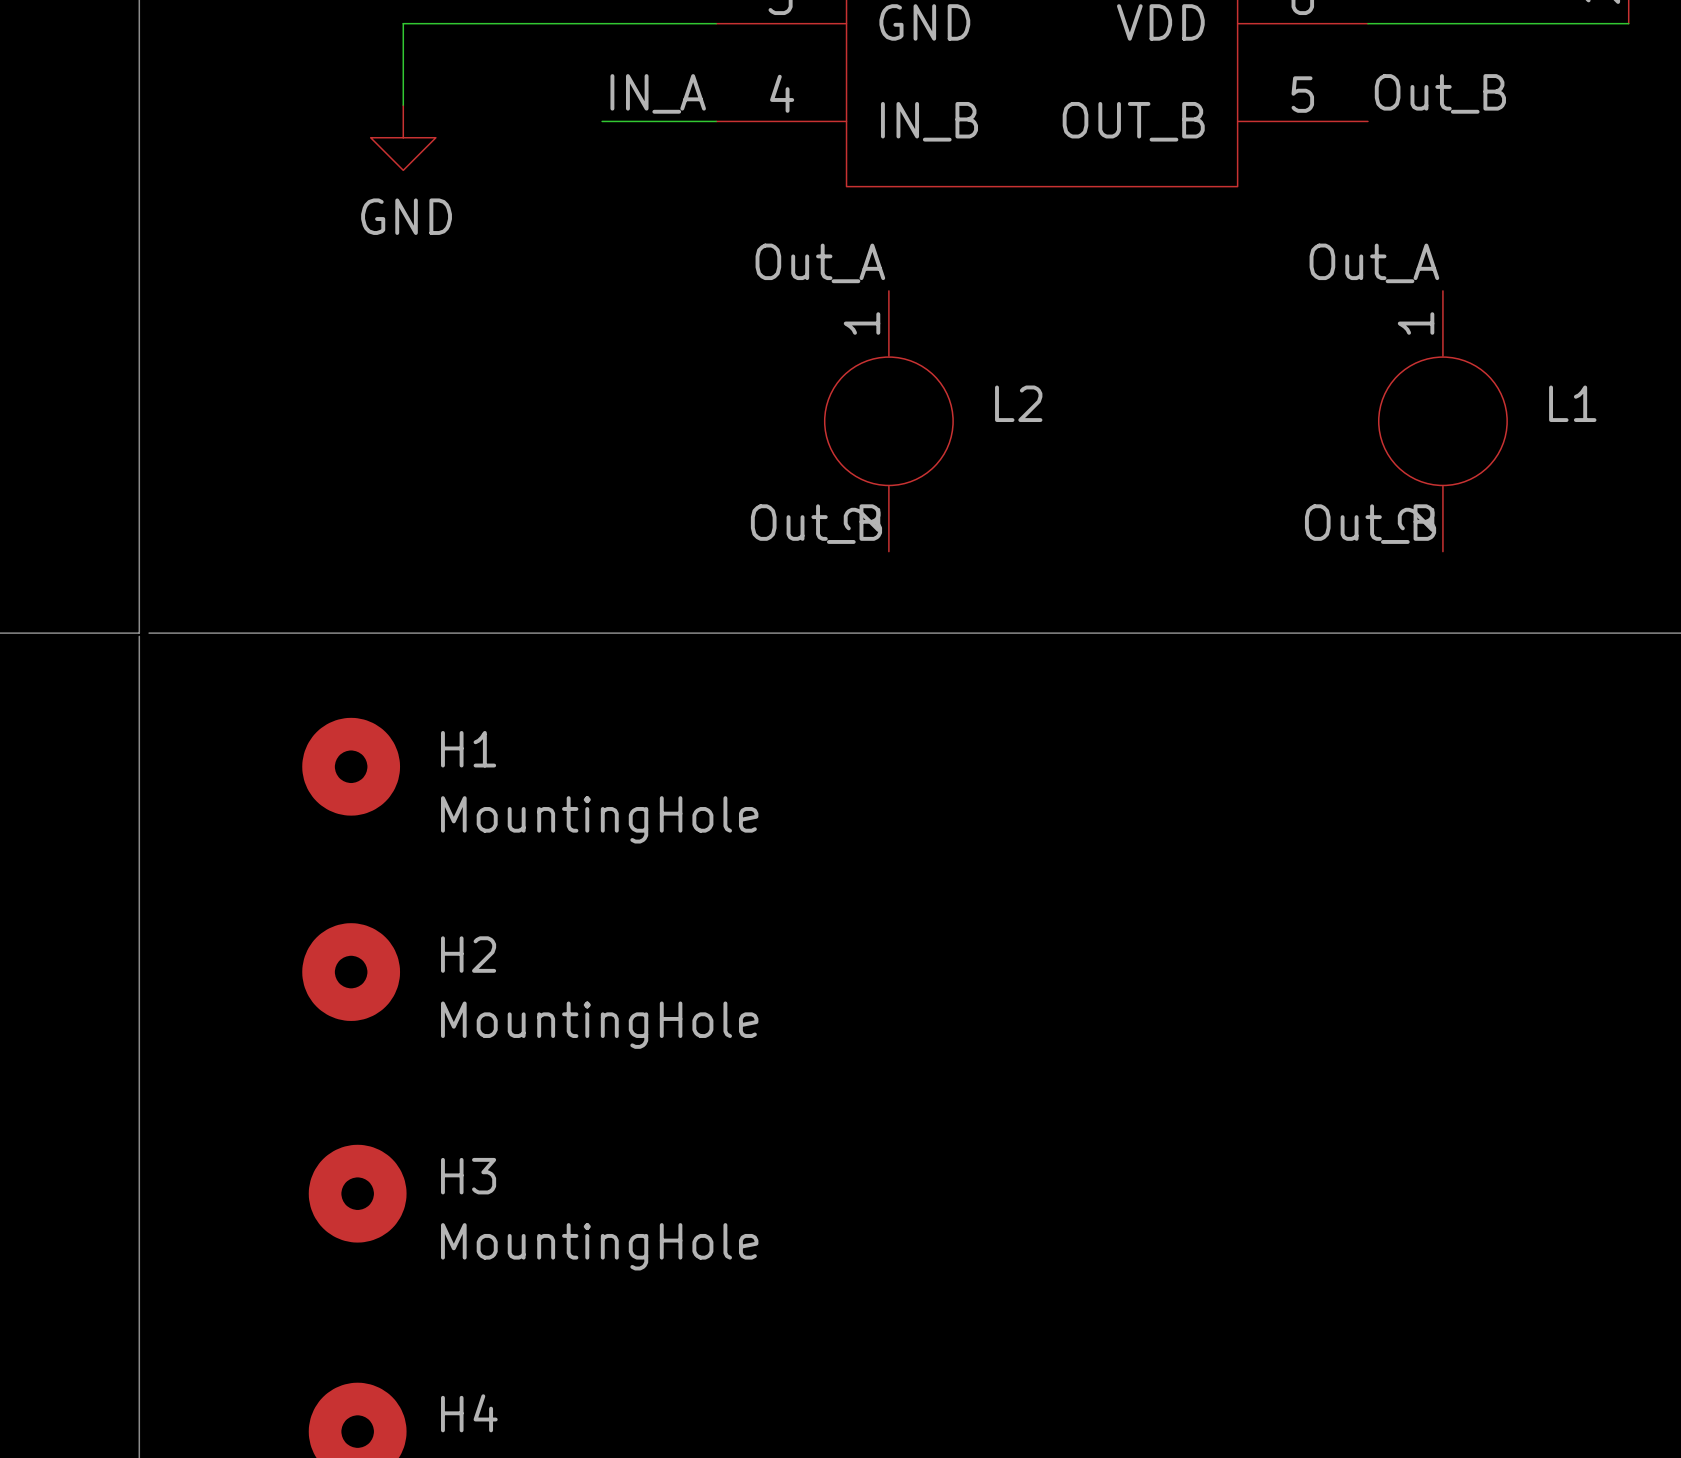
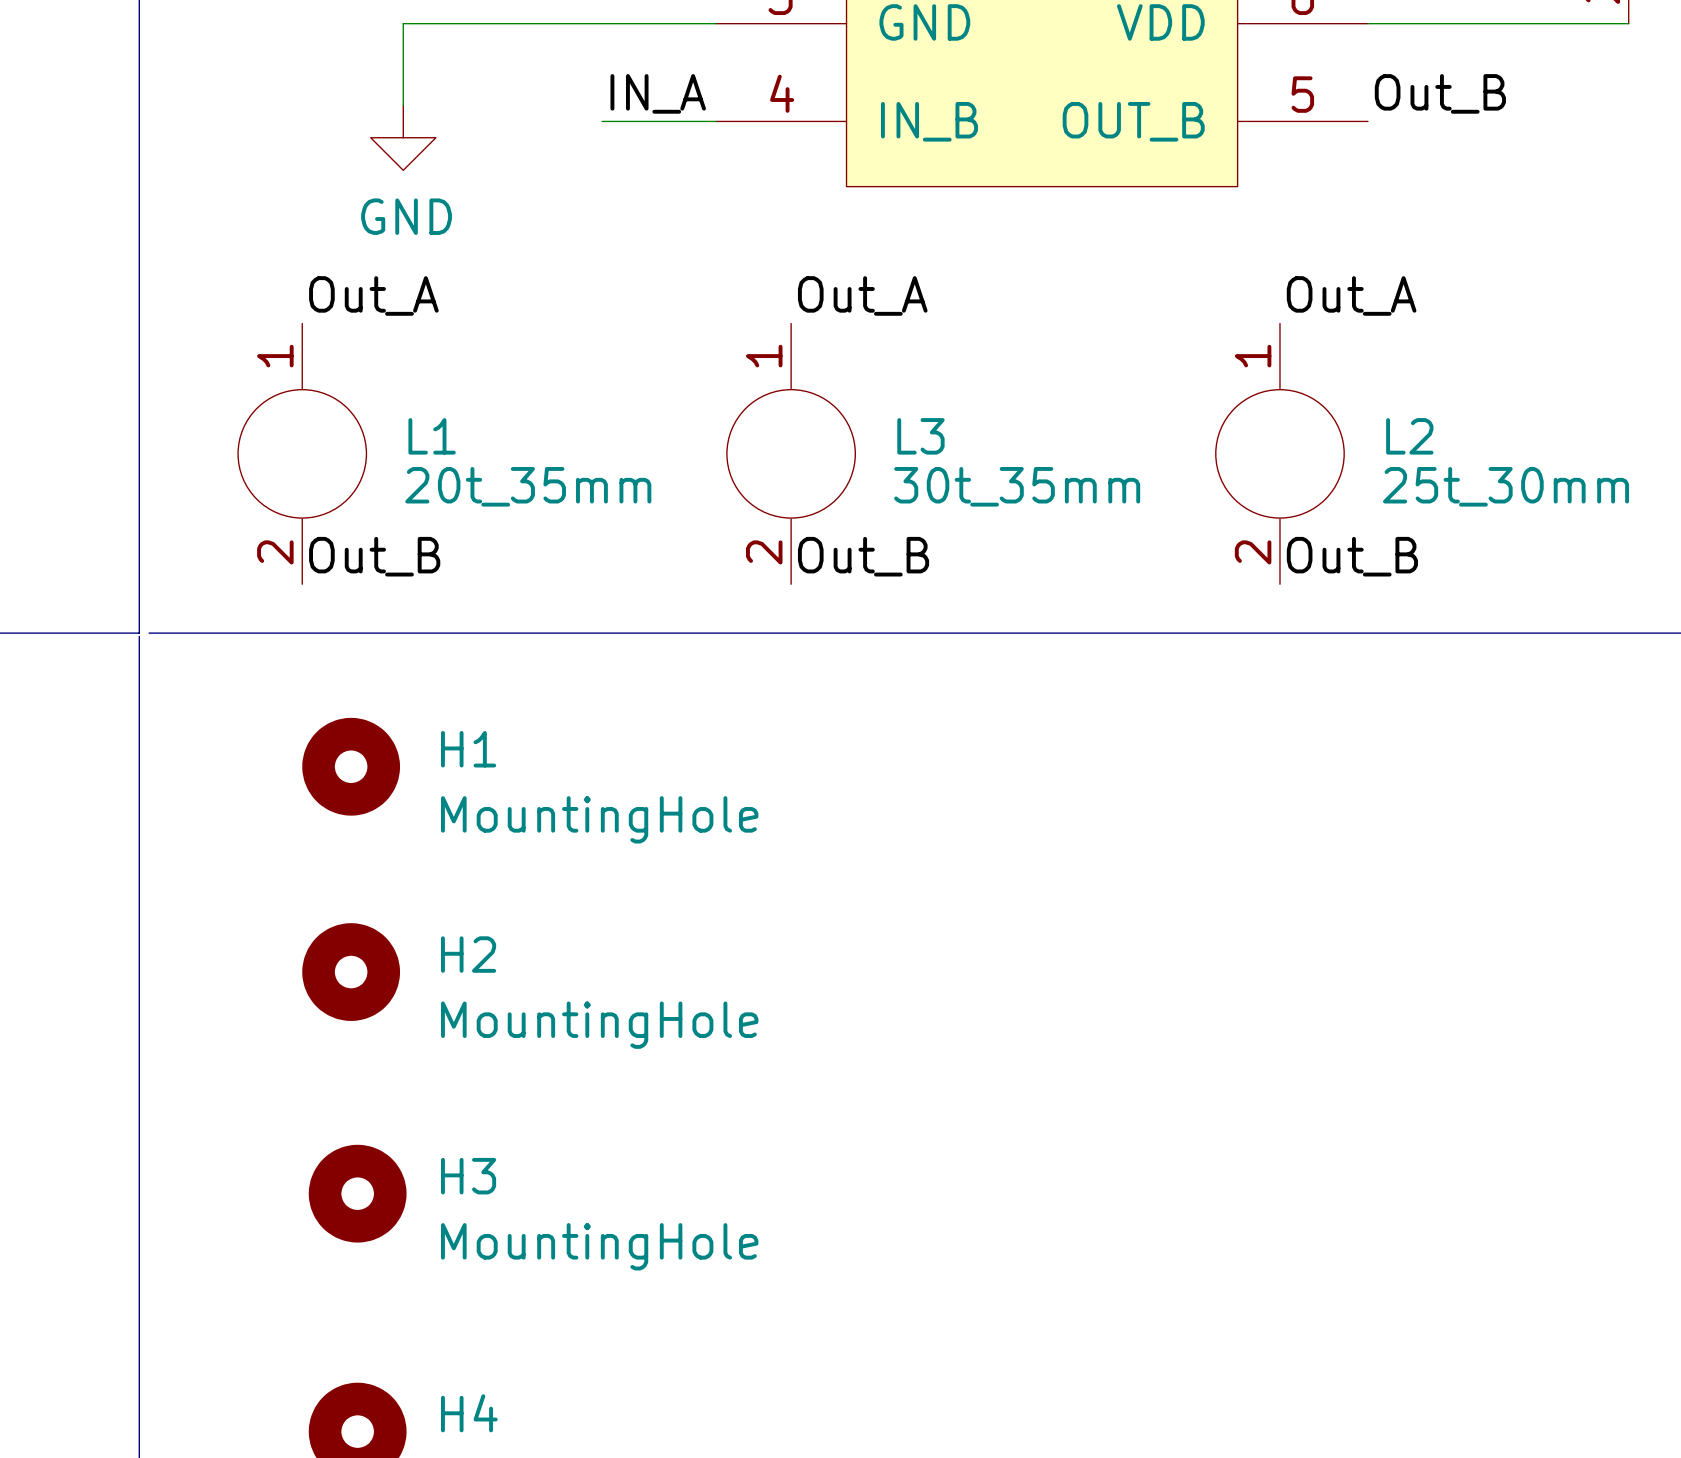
label position: Out_A (820, 263) -> Out_A (862, 295)
label position: Out_A (1374, 263) -> Out_A (1351, 295)
label: none -> Out_A (373, 295)
L2 position: (888, 421) -> (1279, 453)
L1 position: (1442, 421) -> (302, 453)
L3: none -> 30t_35mm (791, 453)
L1 value: none -> 20t_35mm (528, 486)
L2 value: none -> 25t_30mm (1506, 486)
label position: Out_B (816, 524) -> Out_B (863, 556)
label position: Out_B (1370, 524) -> Out_B (1352, 556)
label: none -> Out_B (374, 556)

